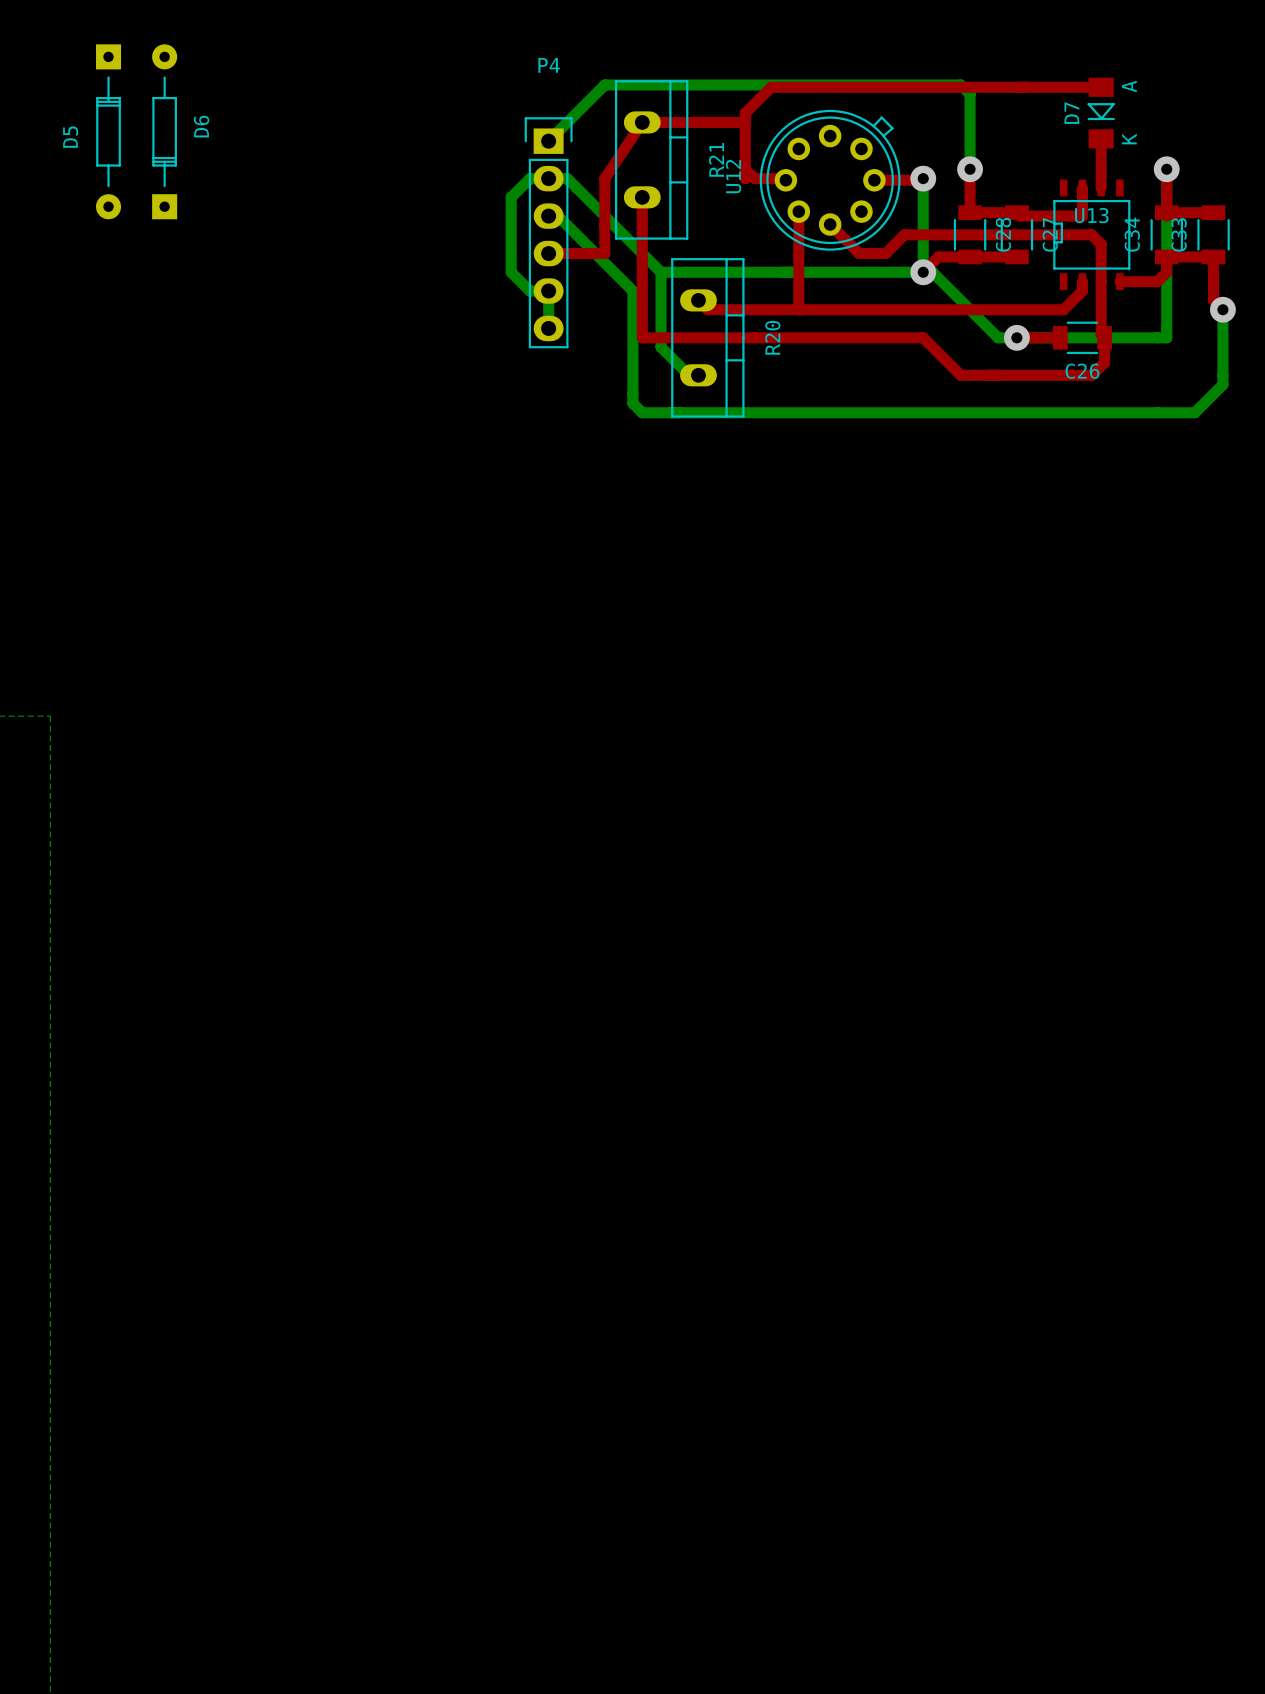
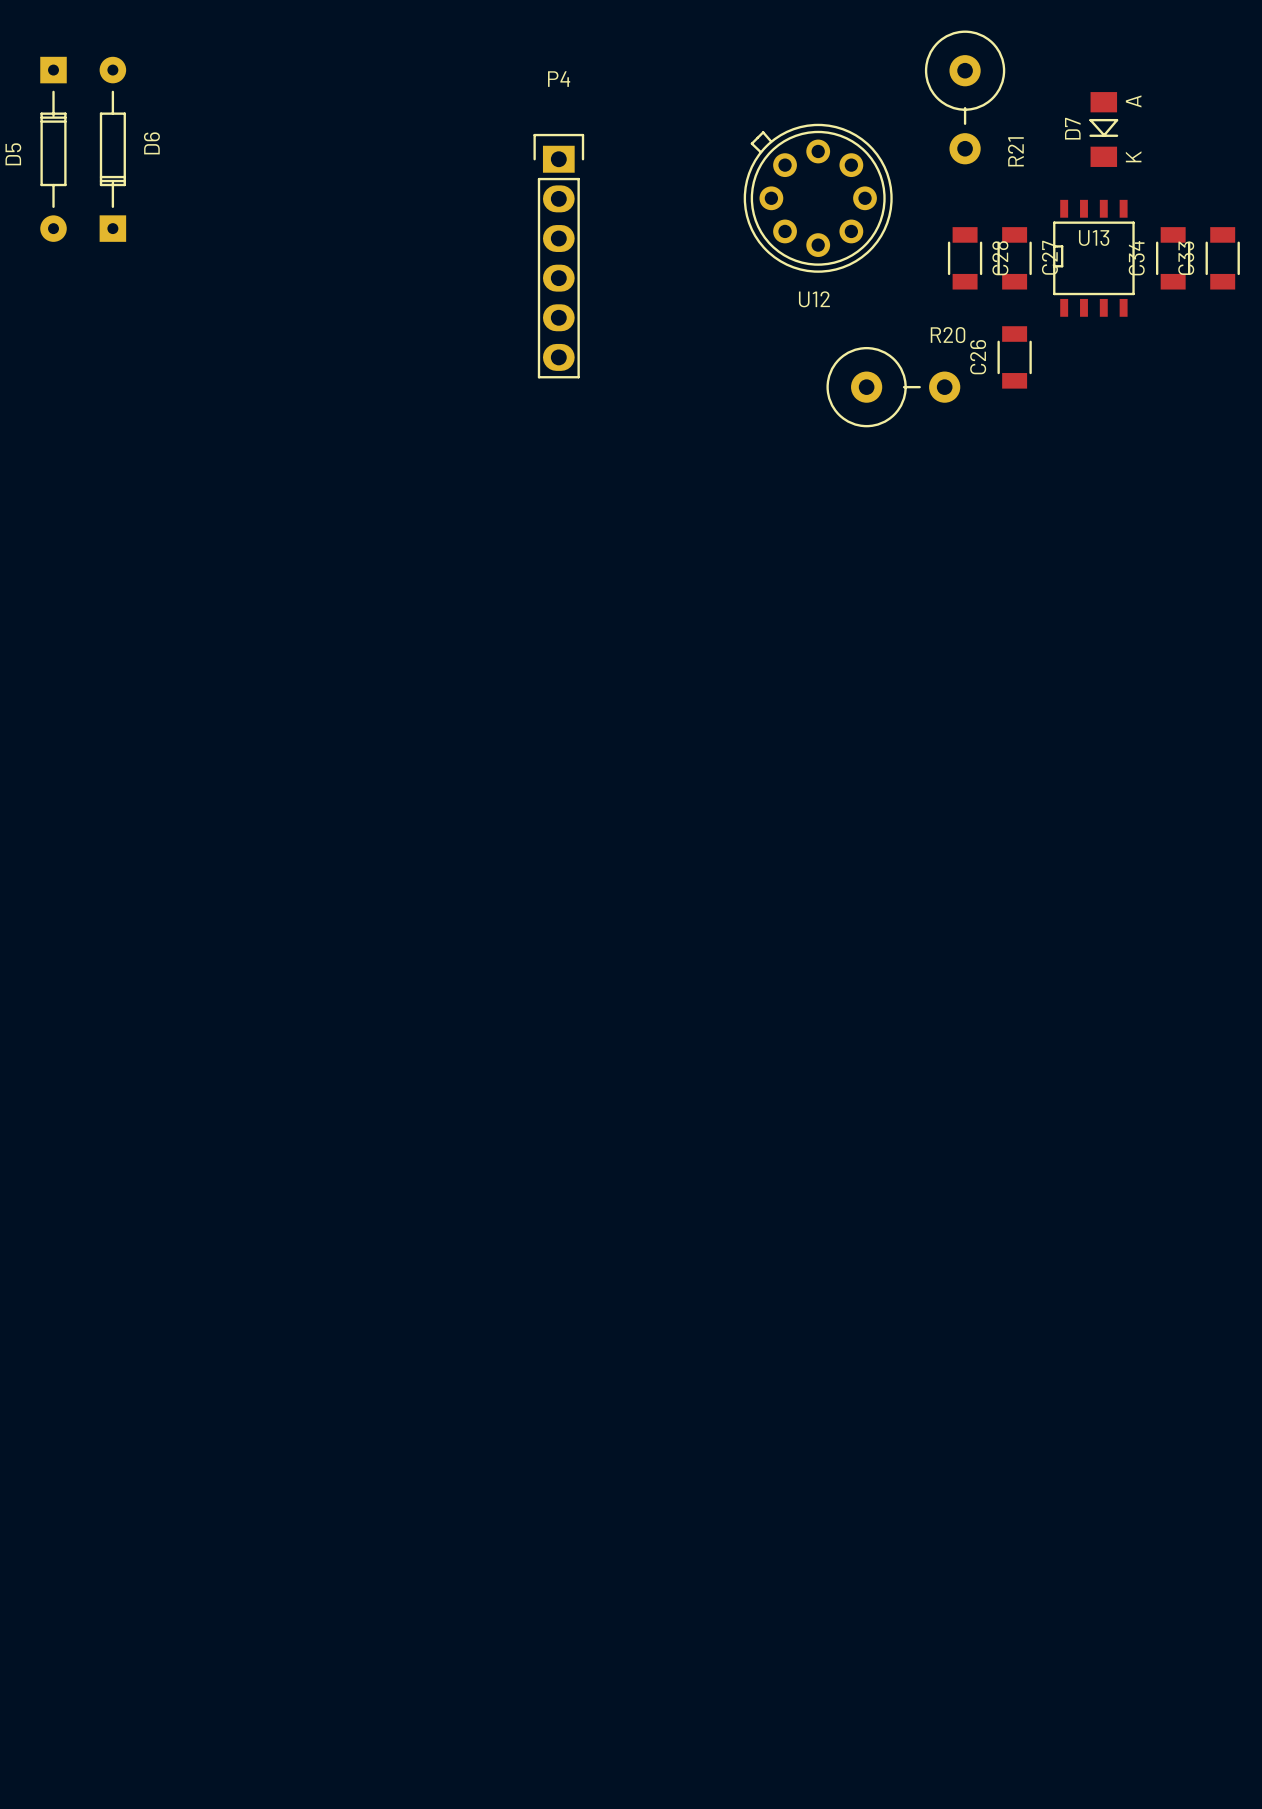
R21 footprint: [614, 80, 689, 240] -> [924, 30, 1006, 165]
top track: (1101, 87) (771, 87) (745, 113) (745, 178) -> none
top track: (745, 122) (642, 122) (604, 178) (604, 253) (548, 253) -> none
top track: (1101, 138) (1101, 187) -> none
bottom track: (548, 141) (604, 84) (960, 84) (970, 94) (970, 169) -> none
R21 name position: R21 (716, 159) -> R21 (1015, 151)
top track: (745, 169) (754, 178) (784, 178) (785, 180) -> none
top track: (970, 169) (970, 212) (1016, 212) (1020, 216) (1082, 216) (1082, 187) -> none
via: (970, 169) -> none
bottom track: (1166, 169) (1166, 337) (998, 337) (932, 272) (661, 272) -> none
top track: (1166, 169) (1166, 216) -> none
via: (1166, 169) -> none
bottom track: (923, 178) (923, 272) -> none
top track: (923, 178) (921, 180) (874, 180) -> none
via: (923, 178) -> none
U12 rotation: 0° (830, 180) -> 90° counterclockwise (818, 198)
top track: (642, 197) (642, 337) (923, 337) (960, 375) (1091, 375) (1104, 362) (1104, 337) (1101, 334) (1101, 244) (1091, 234) (904, 234) (885, 253) (859, 253) (830, 224) -> none
top track: (796, 211) (798, 211) (798, 309) -> none
top track: (1166, 212) (1213, 212) -> none
bottom track: (548, 216) (558, 216) (632, 291) (632, 403) (642, 412) (1194, 412) (1222, 384) (1222, 309) -> none
P4 position: (548, 232) -> (558, 256)
top track: (1022, 256) (938, 256) (923, 272) -> none
R20 footprint: [671, 258, 745, 418] -> [826, 346, 961, 428]
bottom track: (661, 272) (661, 347) (689, 375) (698, 375) -> none
bottom track: (661, 272) (567, 178) (529, 178) (511, 197) (511, 272) (529, 291) (548, 291) (548, 328) -> none
via: (923, 272) -> none
top track: (1082, 281) (1082, 291) (1063, 309) (707, 309) (698, 300) -> none
top track: (1119, 281) (1157, 281) (1166, 272) (1166, 256) (1213, 256) (1213, 300) (1222, 309) -> none
via: (1222, 309) -> none
R20 name position: R20 (772, 337) -> R20 (948, 335)
top track: (1016, 337) (1060, 337) -> none
via: (1016, 337) -> none
C26 rotation: 0° (1082, 337) -> 90° clockwise (1014, 357)
C26 position: (1082, 337) -> (1014, 357)

